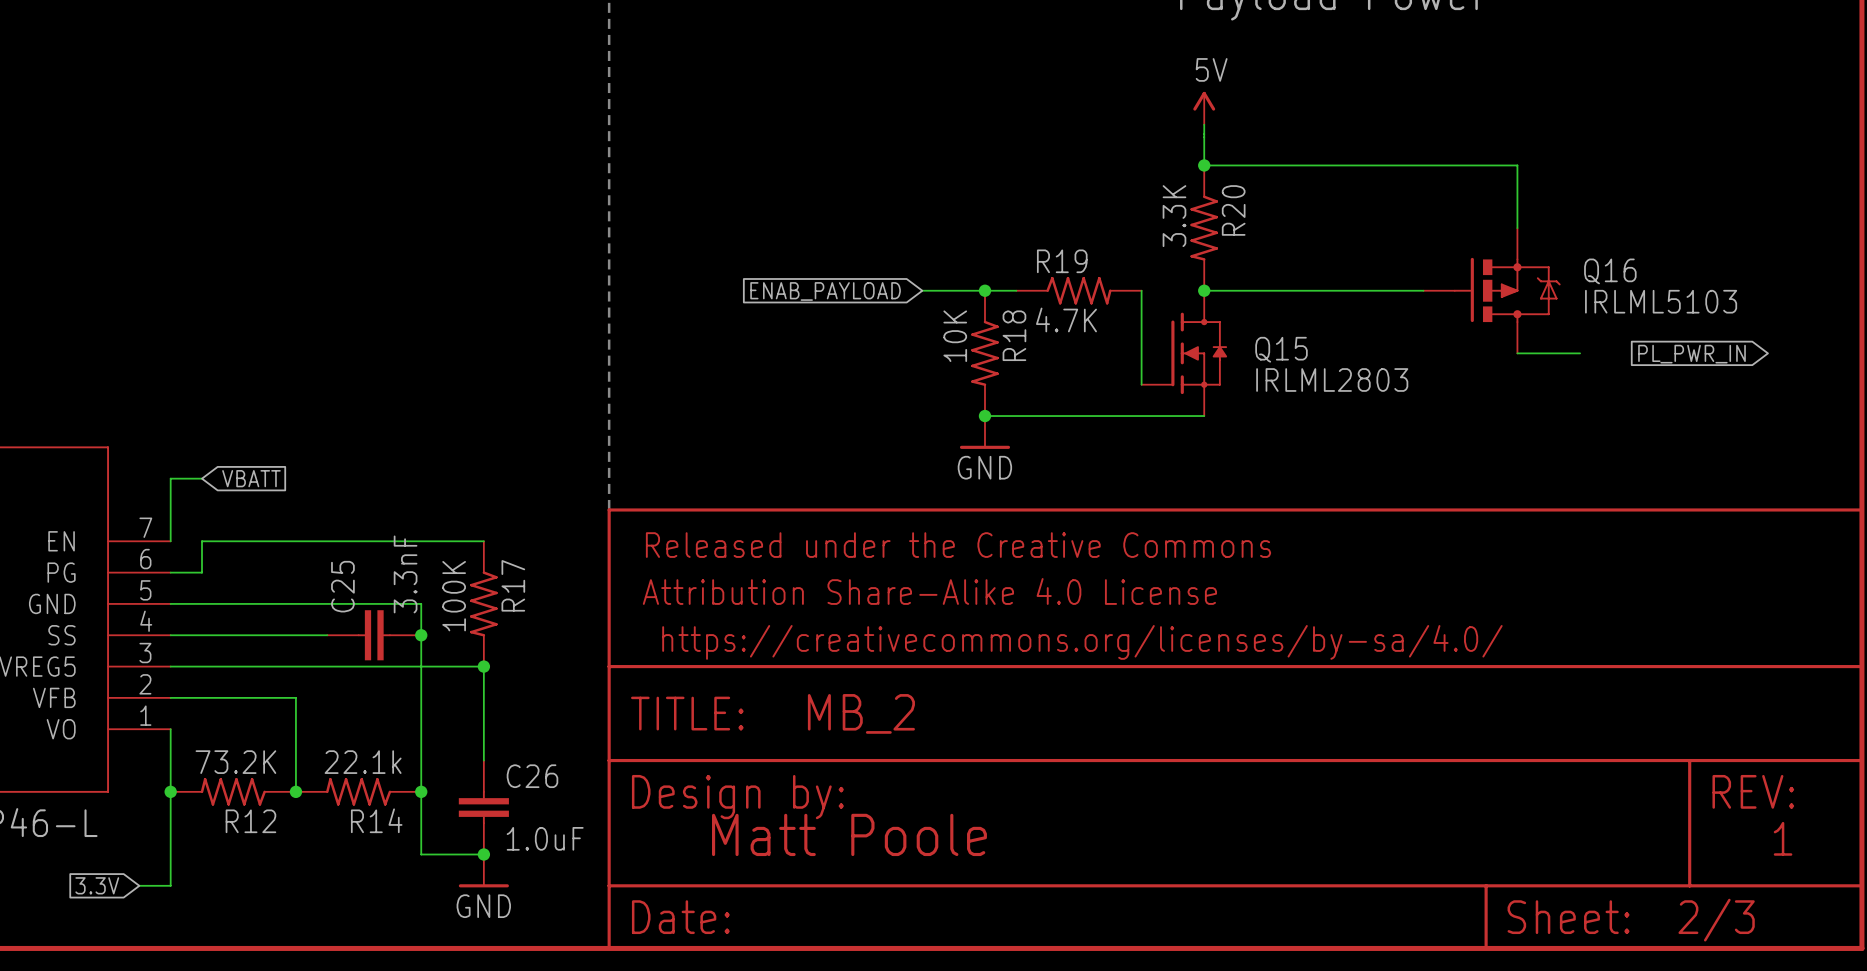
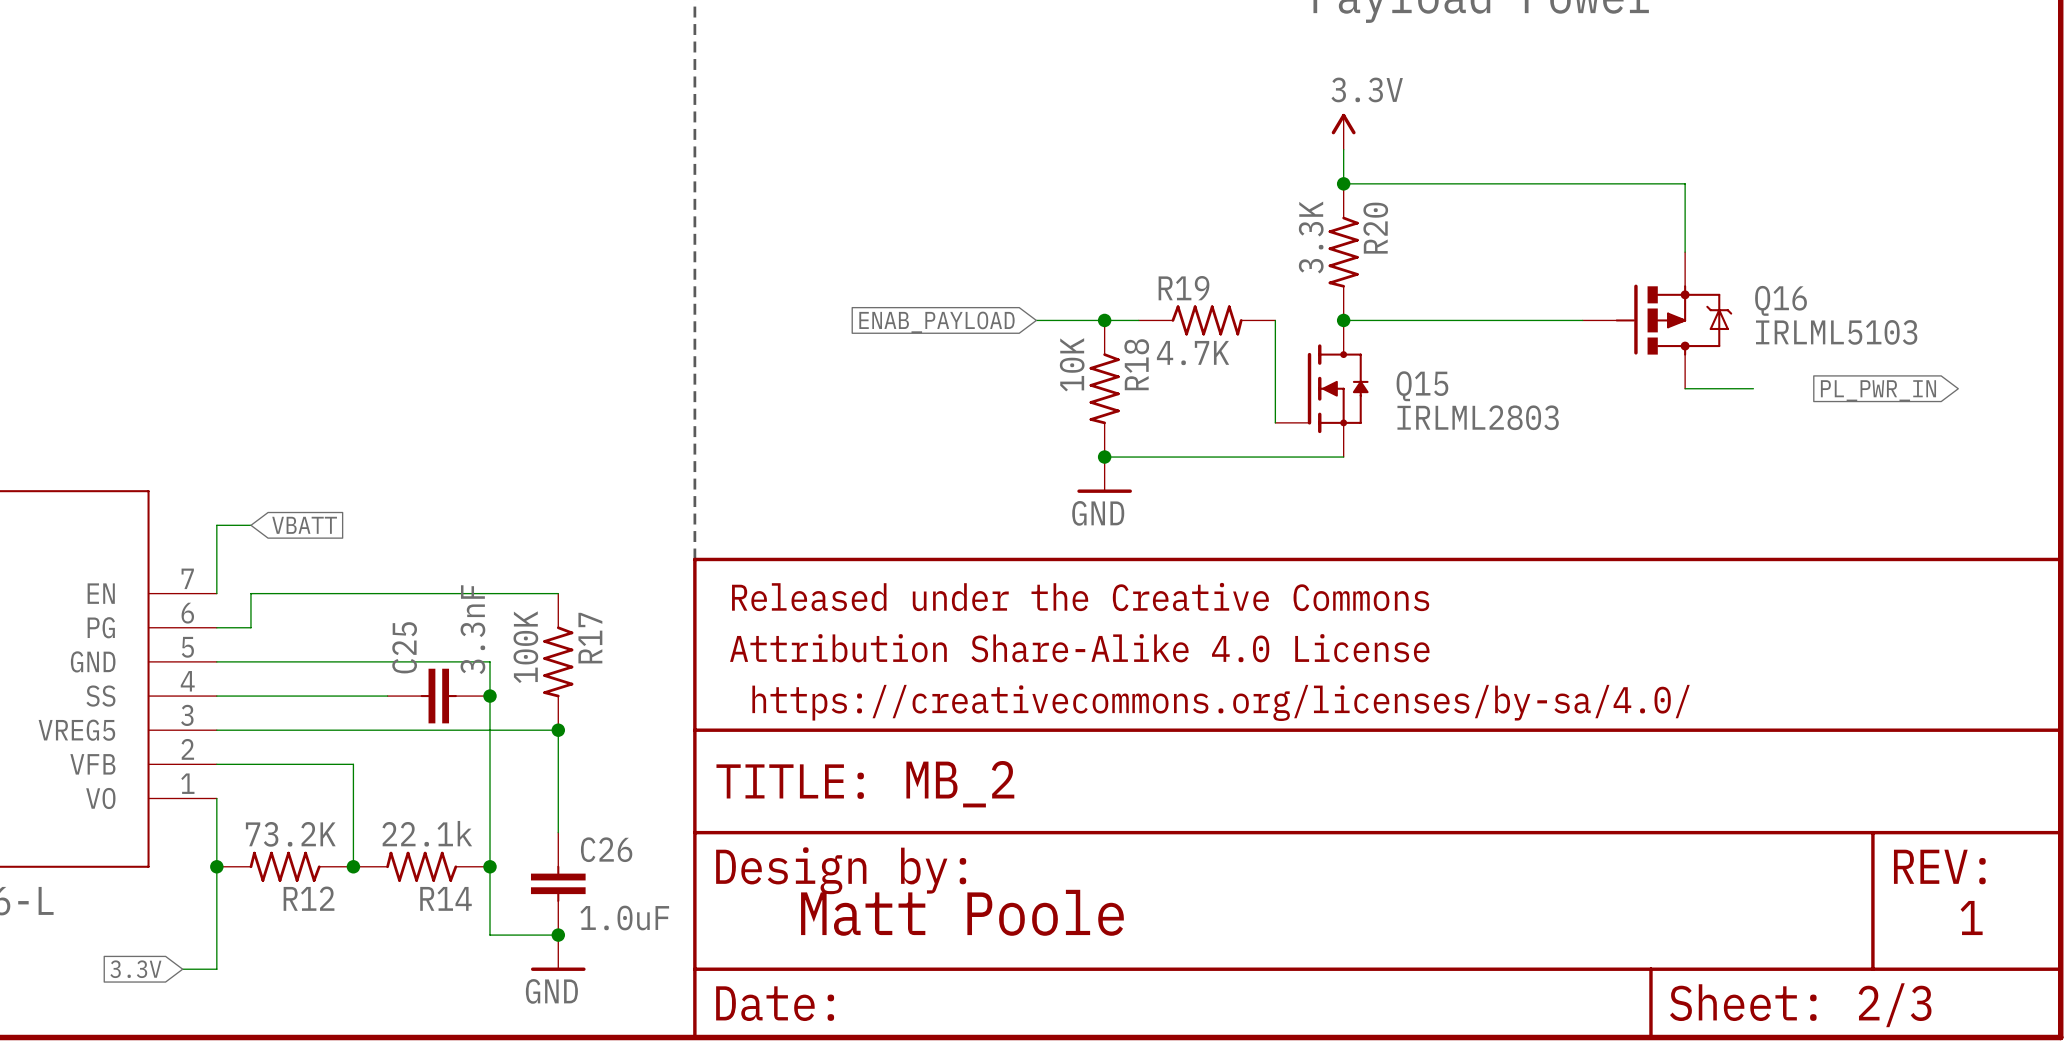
power symbol: 5V (1204, 108) -> 3.3V (1343, 131)

